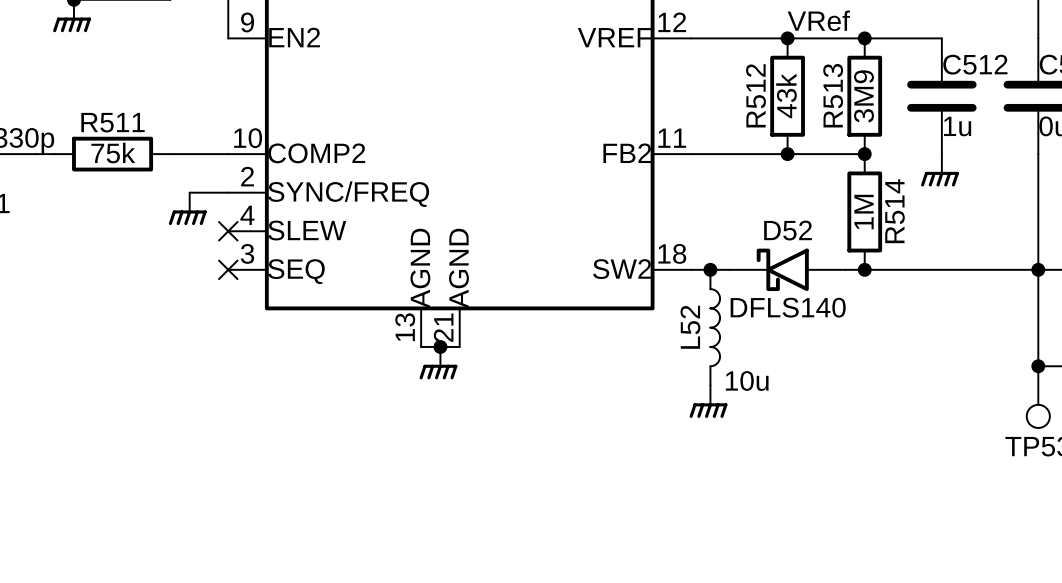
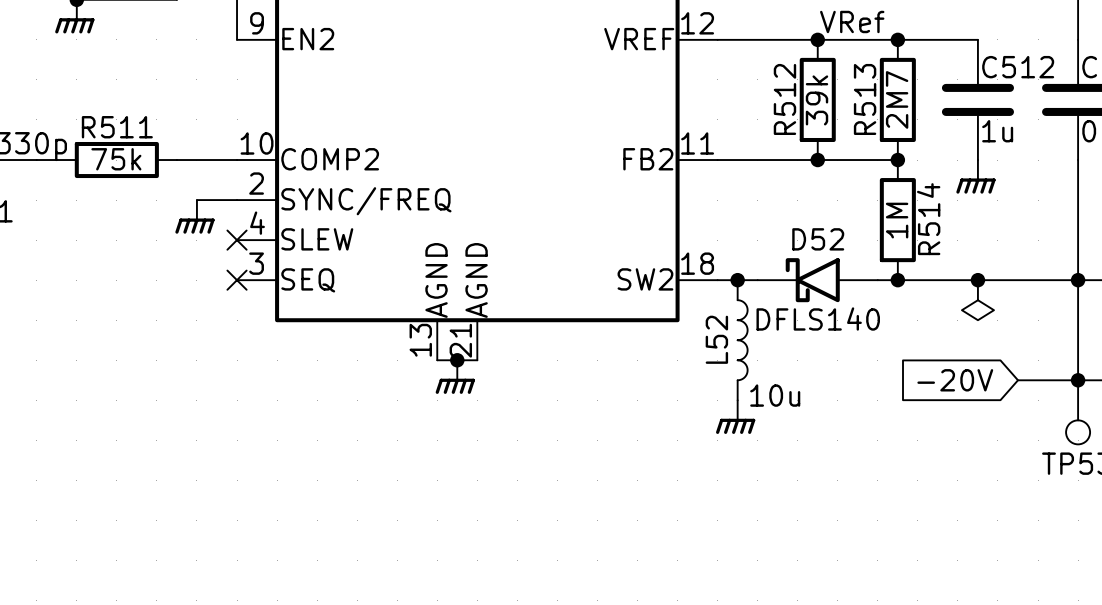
R512 value: 43k (786, 95) -> 39k (817, 100)
R513 value: 3M9 (864, 96) -> 2M7 (897, 99)
junction: none -> (977, 280)
power symbol: none -> (977, 300)
global label: none -> -20V (955, 380)
wire: none -> (1018, 380) (1078, 380)

